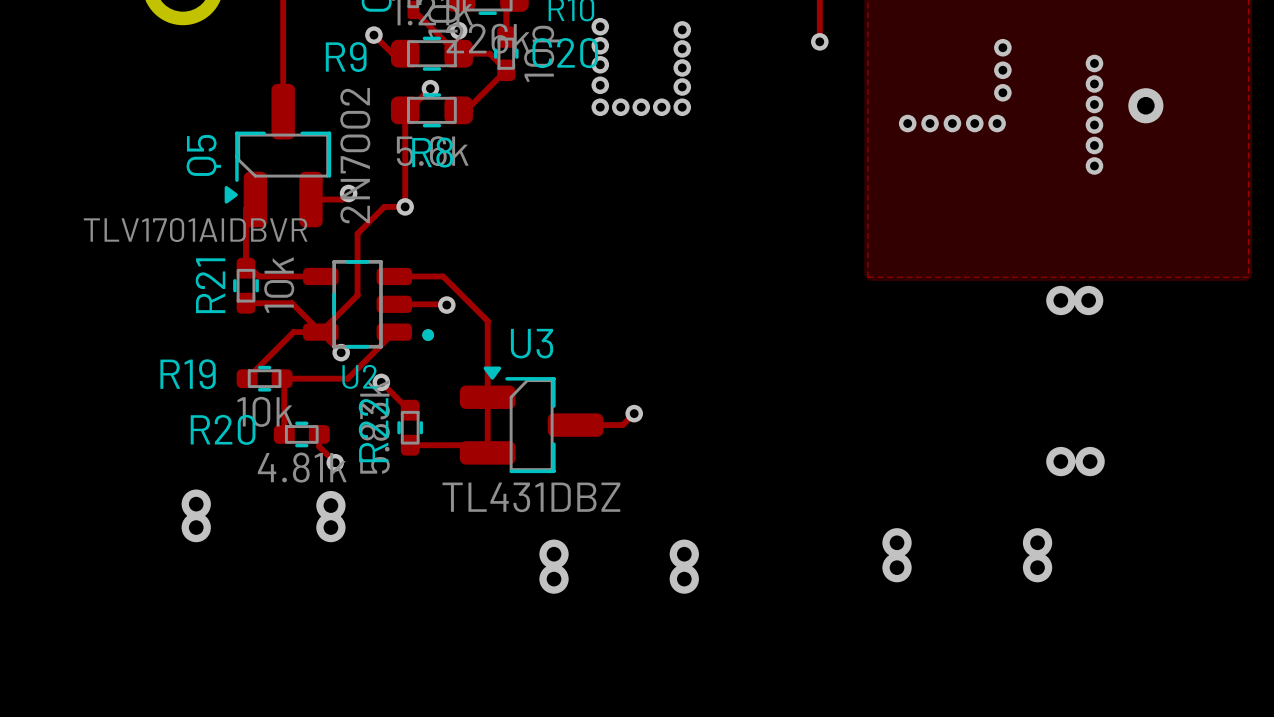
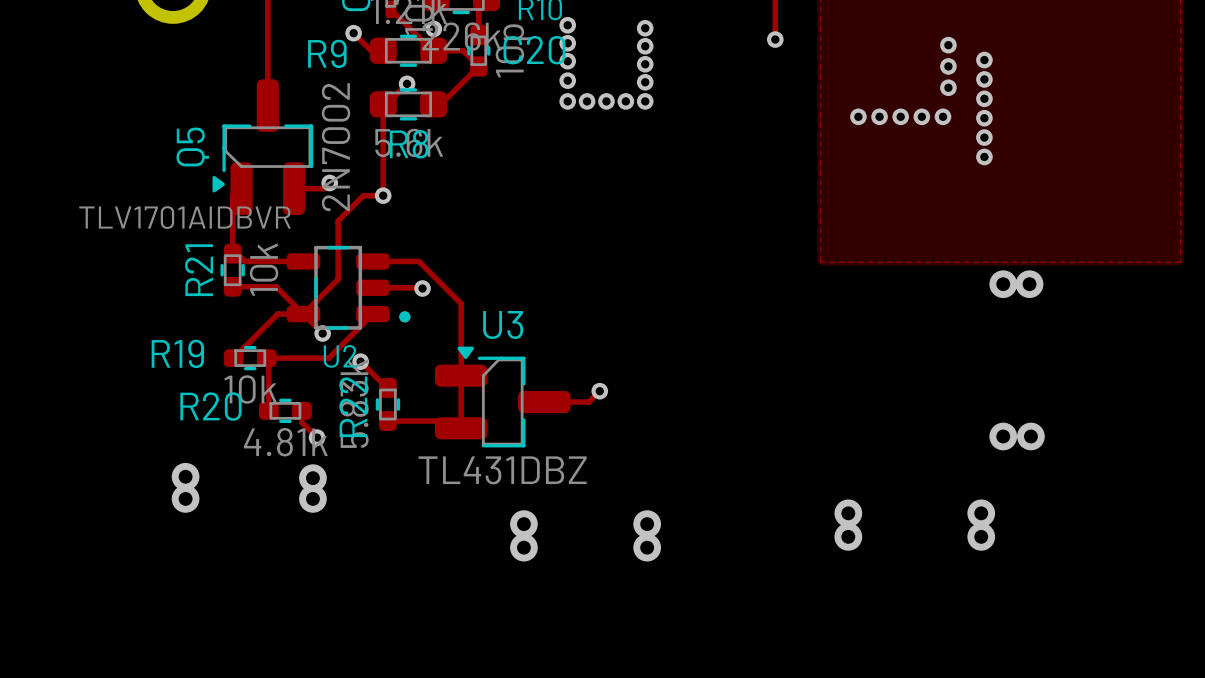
via: none -> (984, 60)
via: (1094, 63) -> none
via: none -> (984, 79)
via: (1094, 83) -> none
via: none -> (984, 98)
via: (1094, 104) -> none
via: (1145, 105) -> none
via: none -> (984, 118)
via: (1094, 124) -> none
via: none -> (984, 137)
via: (1094, 145) -> none
via: none -> (984, 156)
via: (1094, 165) -> none

